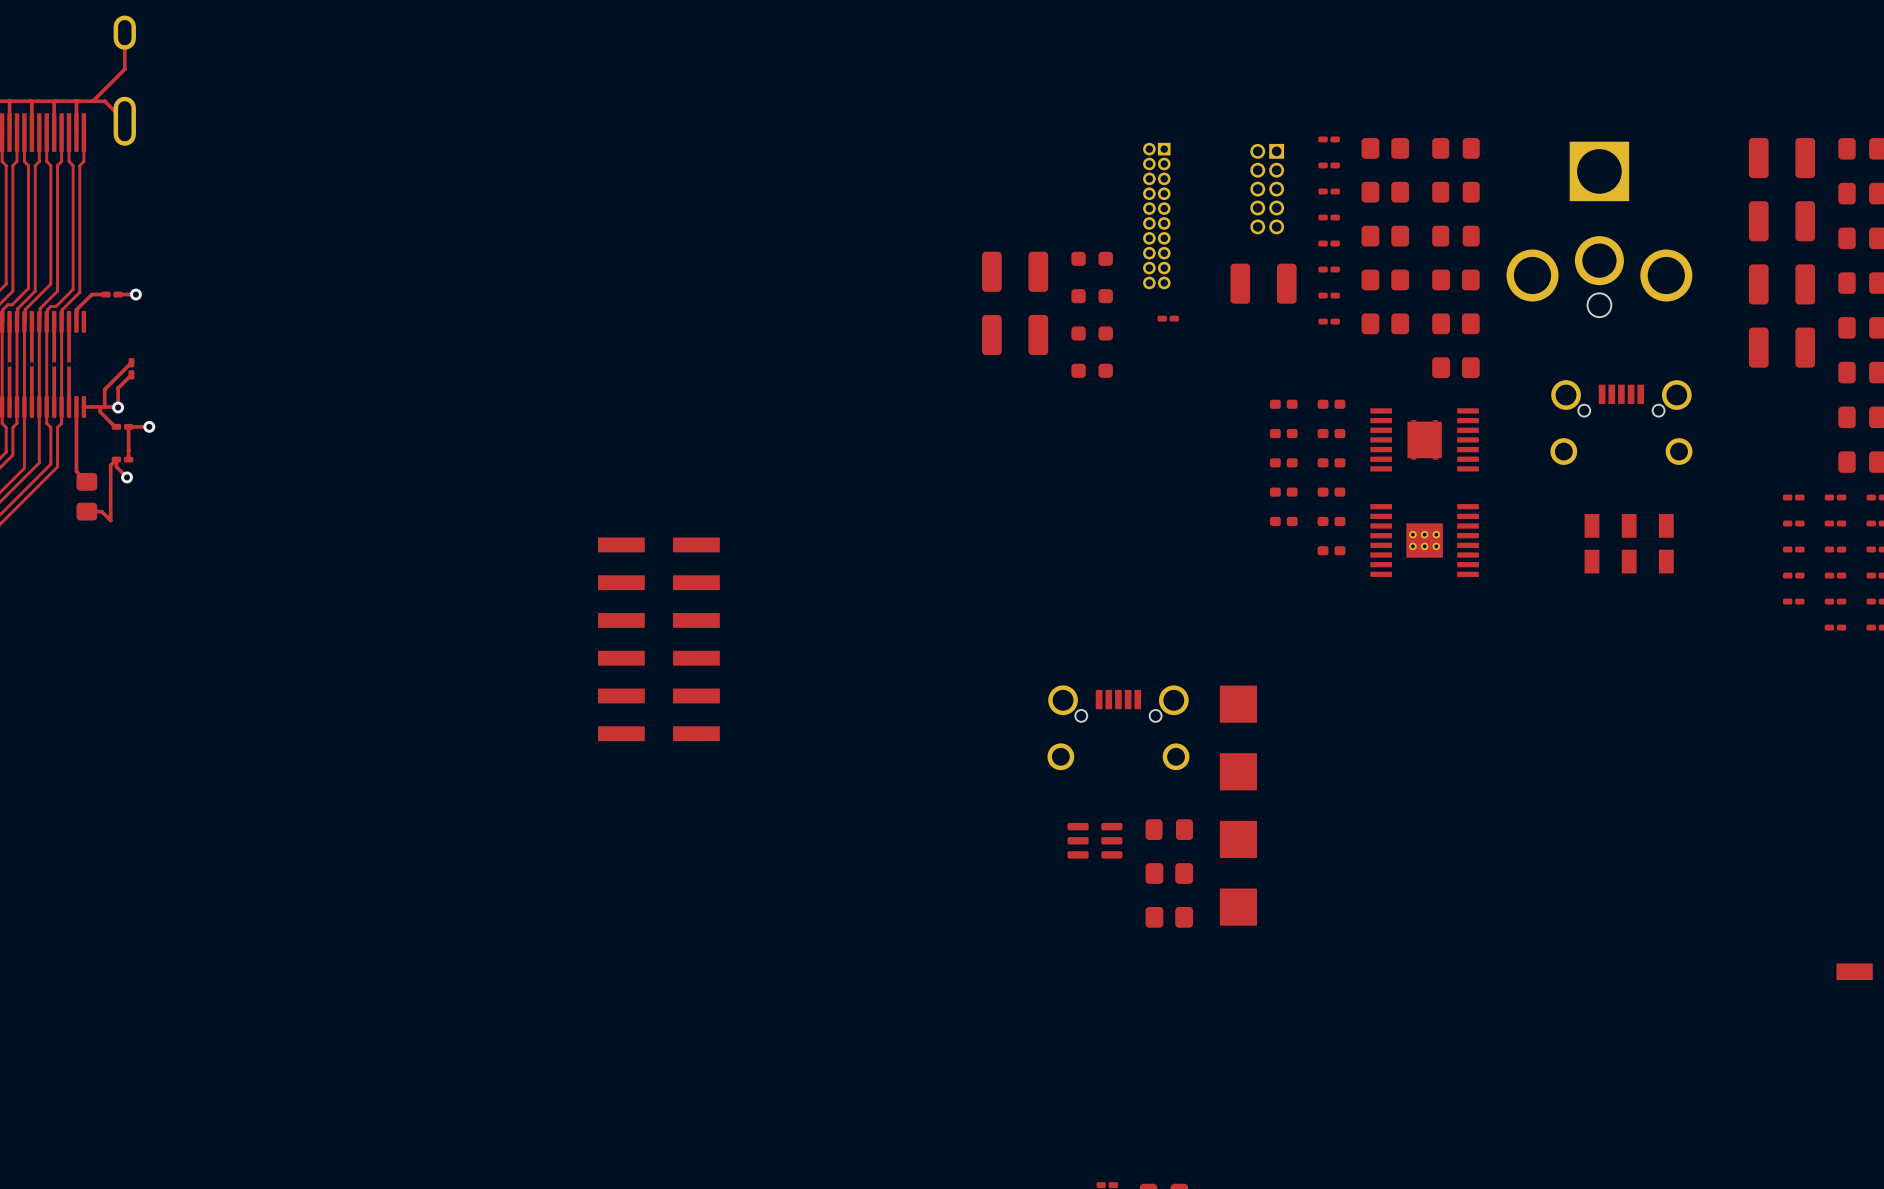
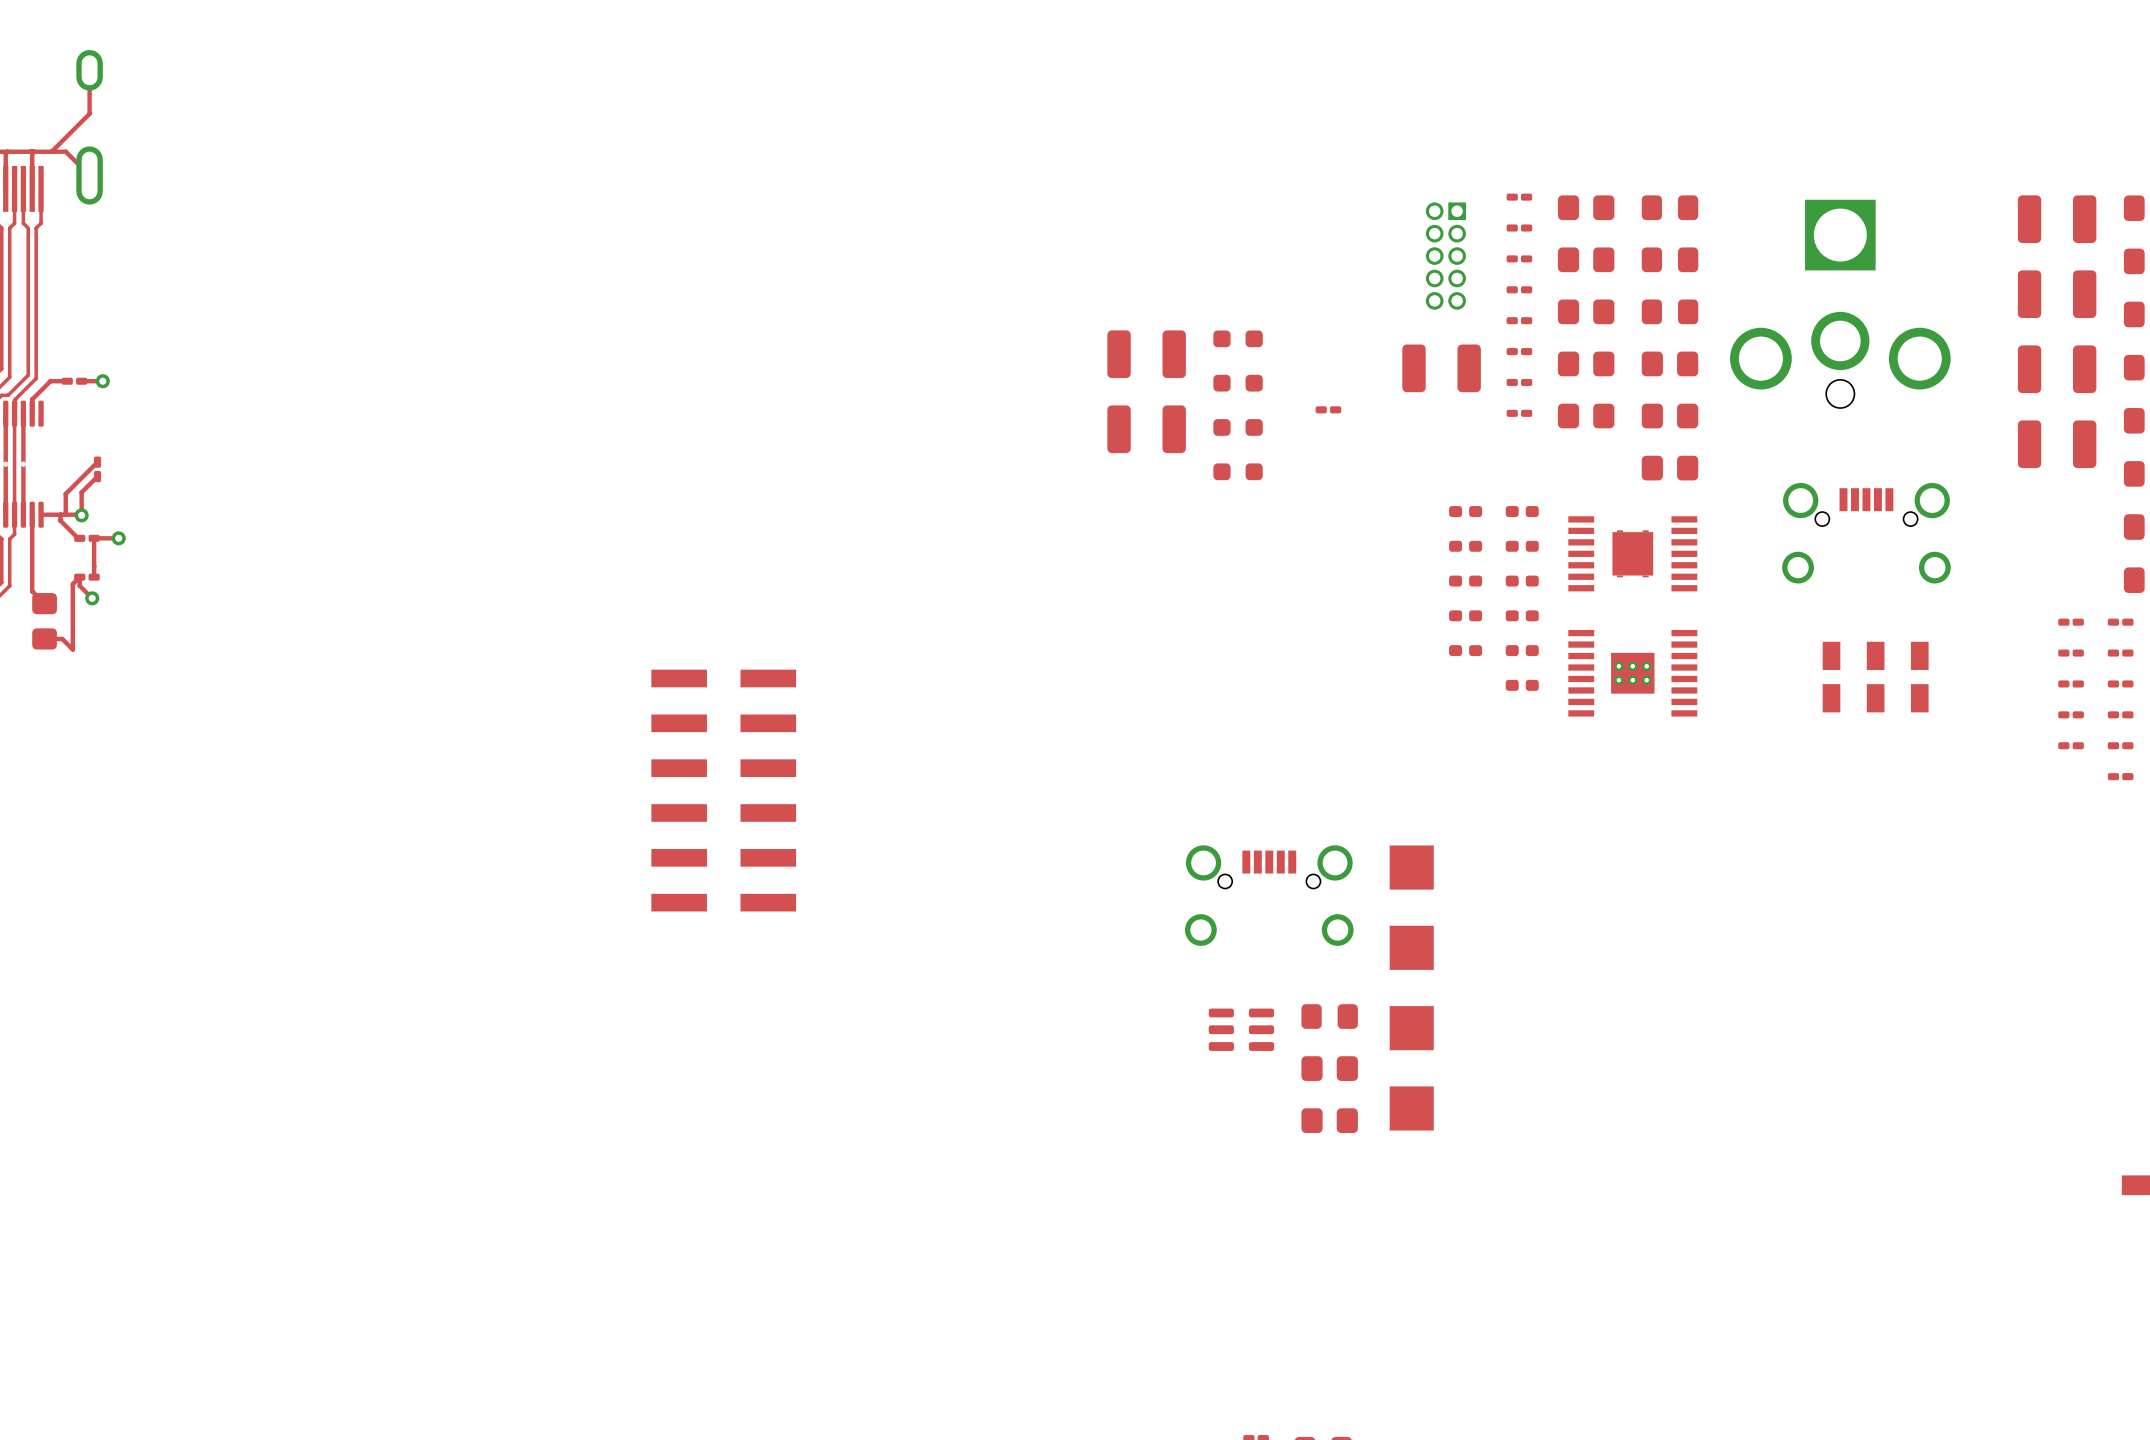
part: (1156, 216) -> none

